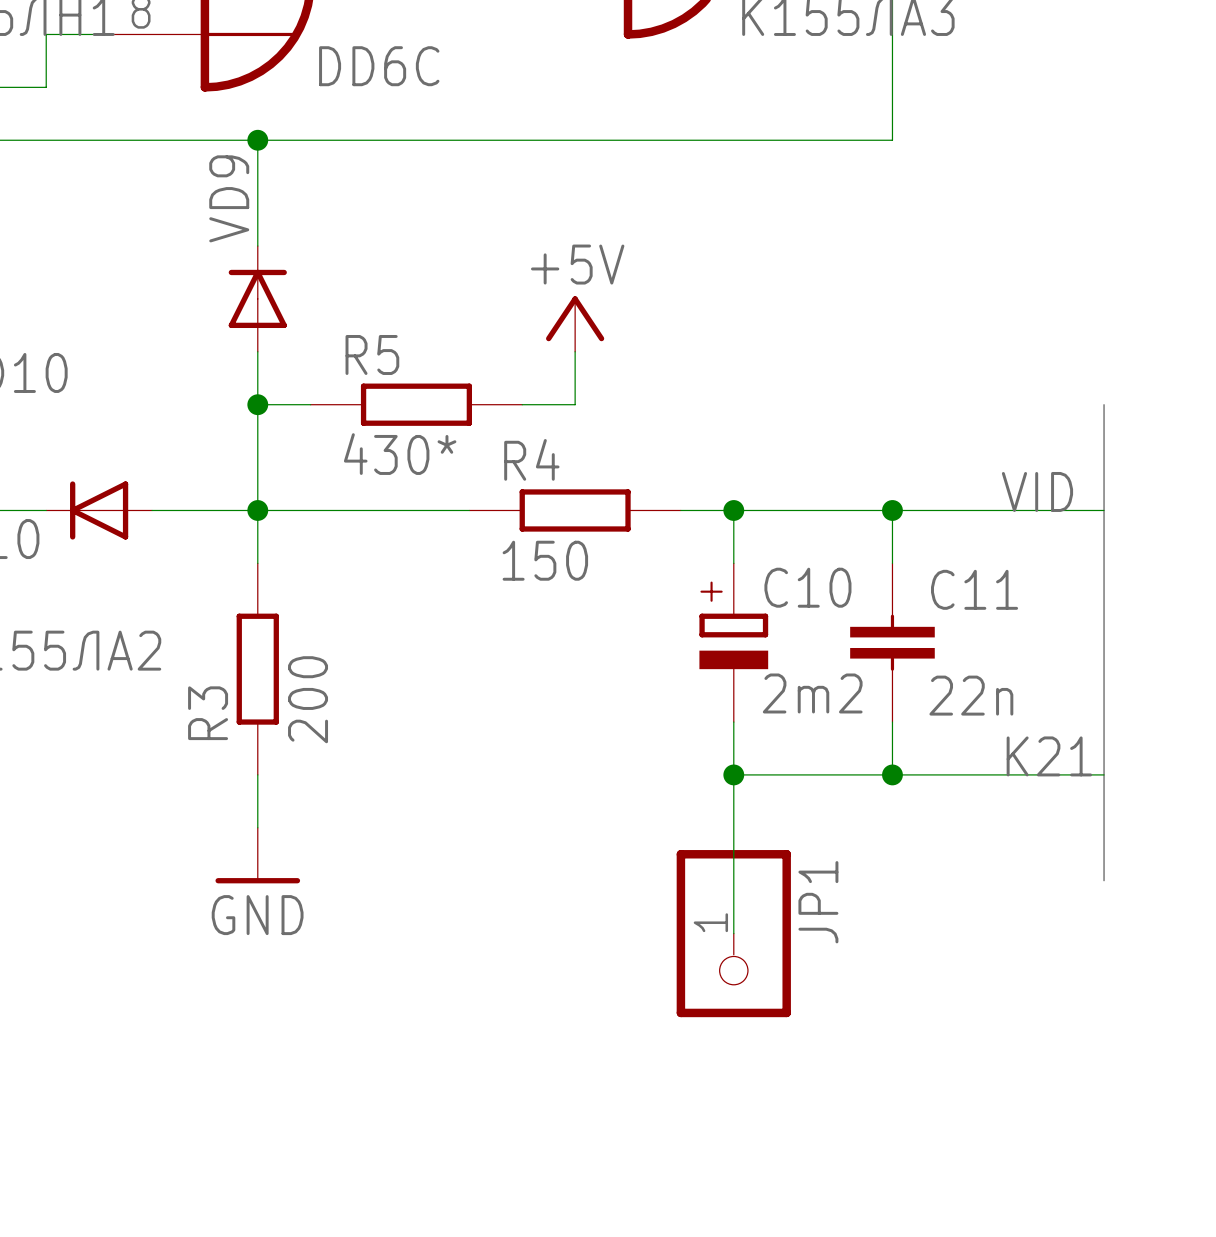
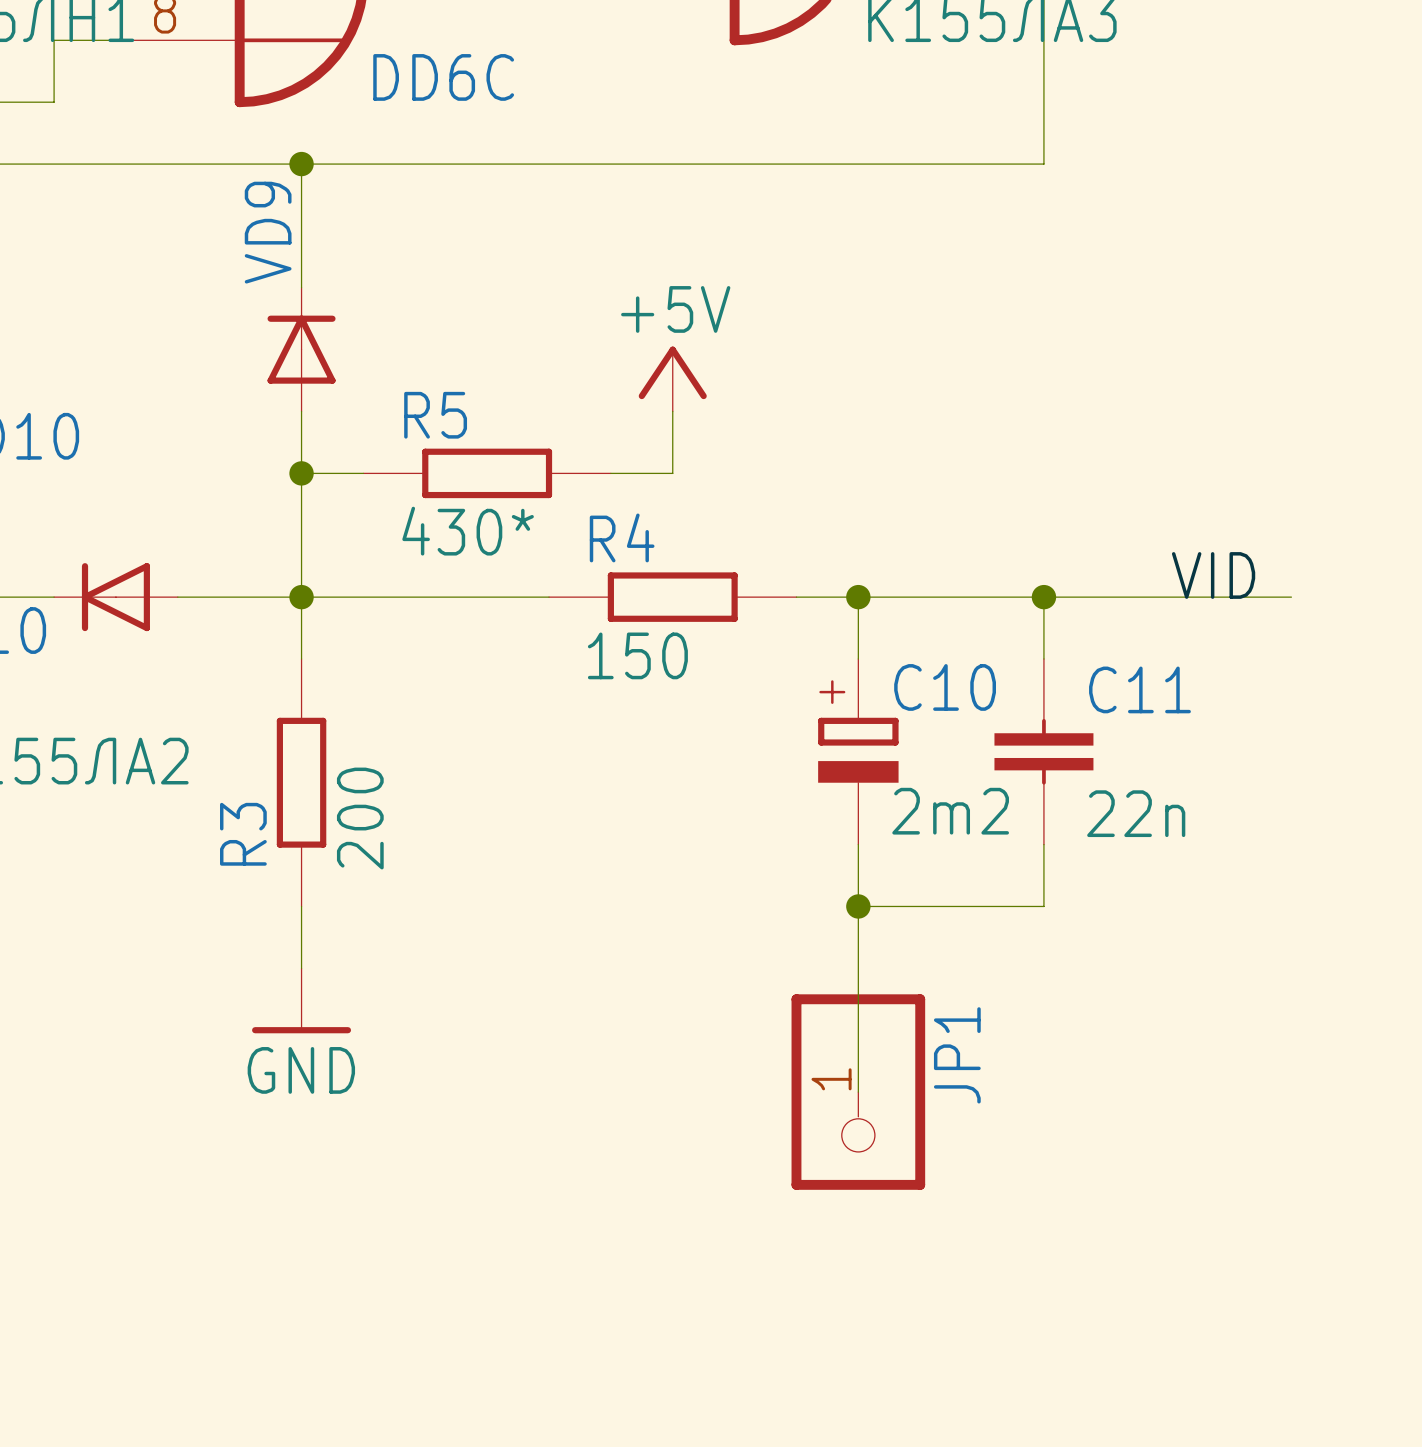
bus: (1104, 404) (1104, 880) -> none
label: K21 (1049, 756) -> none
wire: (892, 774) (1104, 774) -> none
junction: (892, 774) -> none

